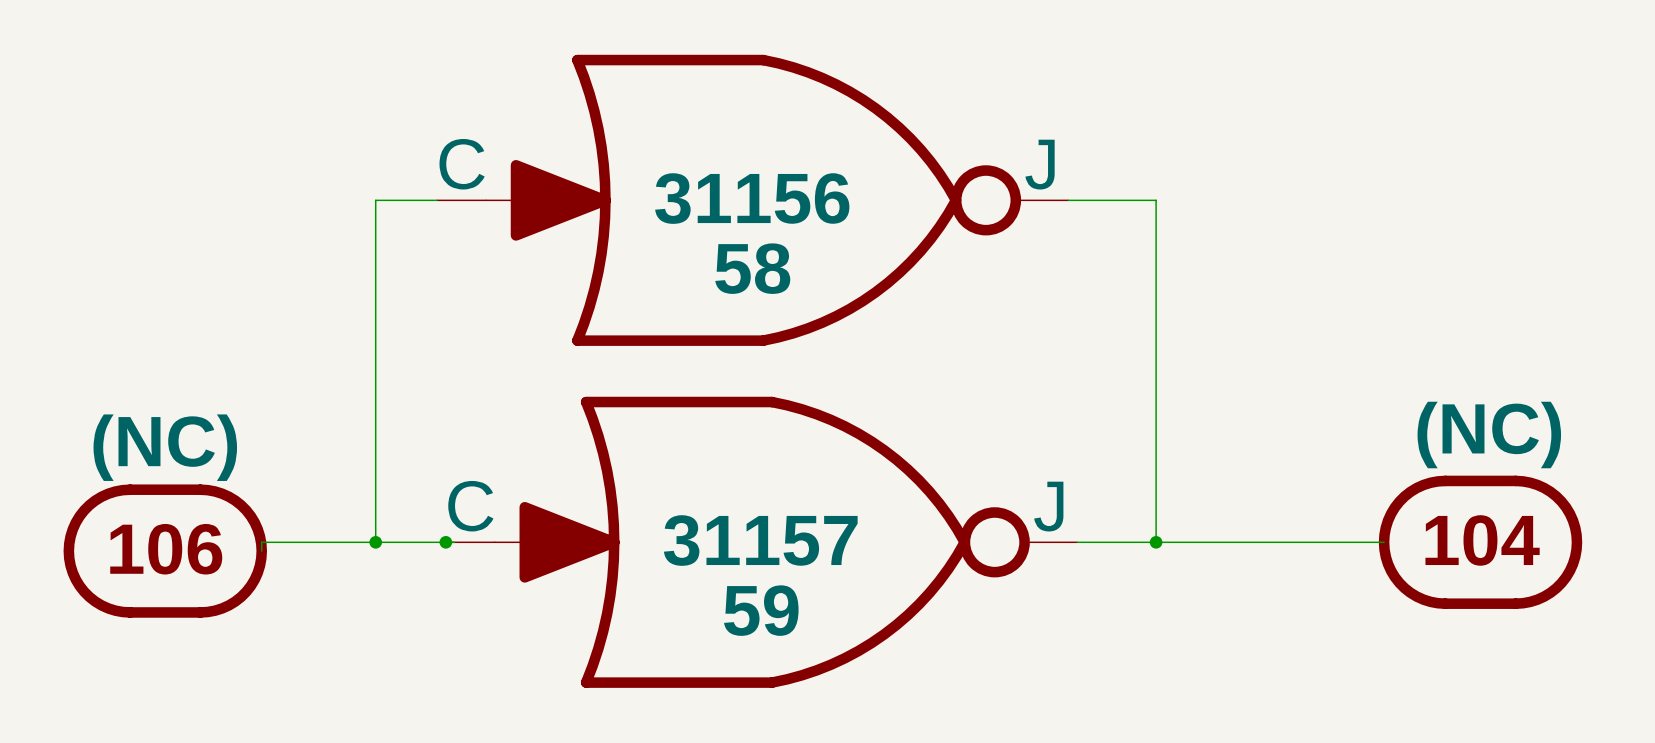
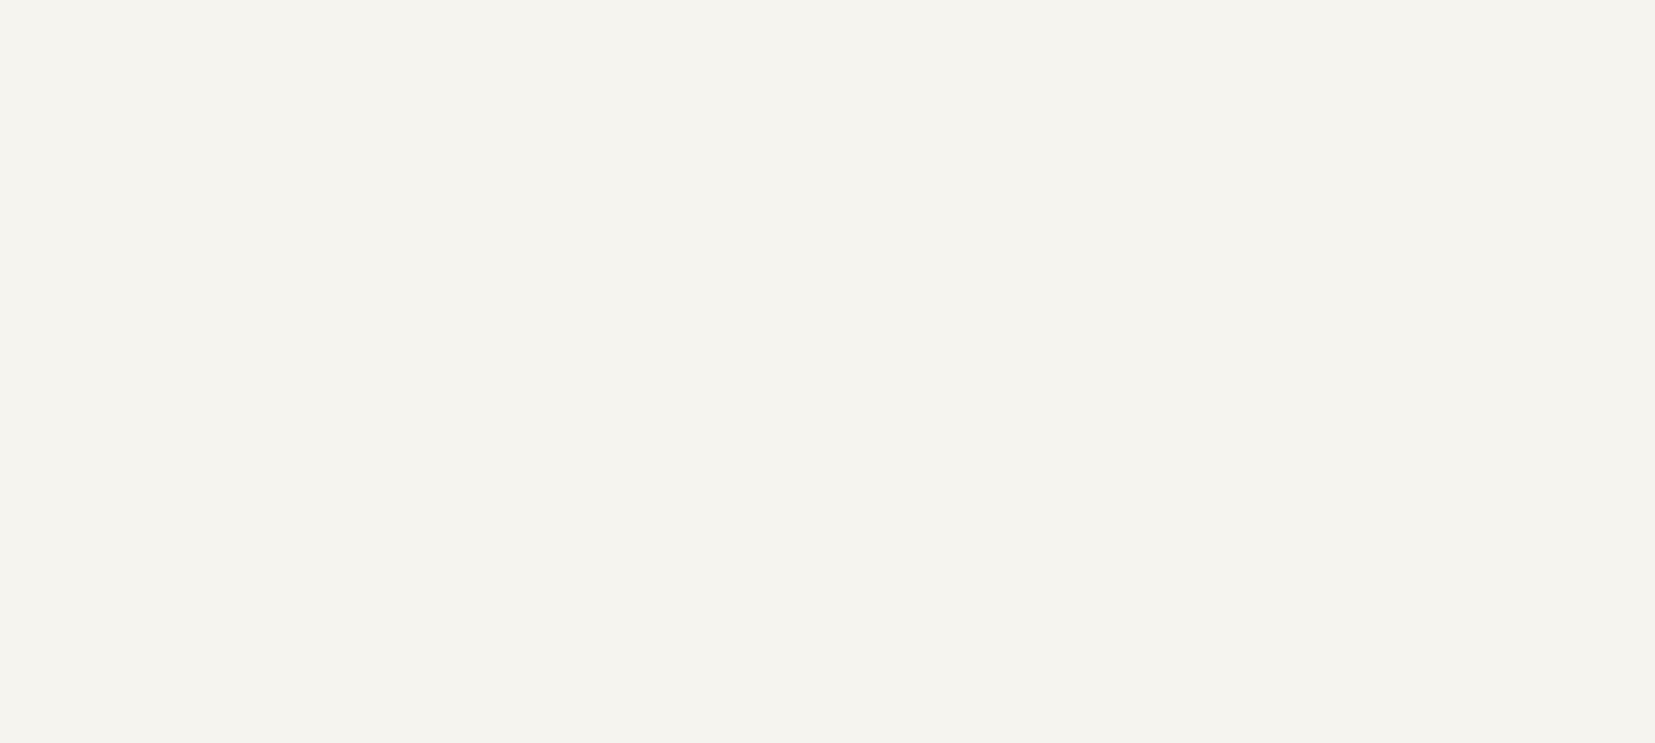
wire: (437, 200) (375, 200) (375, 542) -> none
part: (752, 200) -> none
wire: (1068, 200) (1156, 200) (1156, 542) -> none
junction: (375, 542) -> none
junction: (445, 542) -> none
wire: (454, 542) (261, 542) (261, 551) -> none
part: (761, 542) -> none
wire: (1077, 542) (1384, 542) -> none
junction: (1156, 542) -> none
part: (1480, 542) -> none
part: (165, 551) -> none

